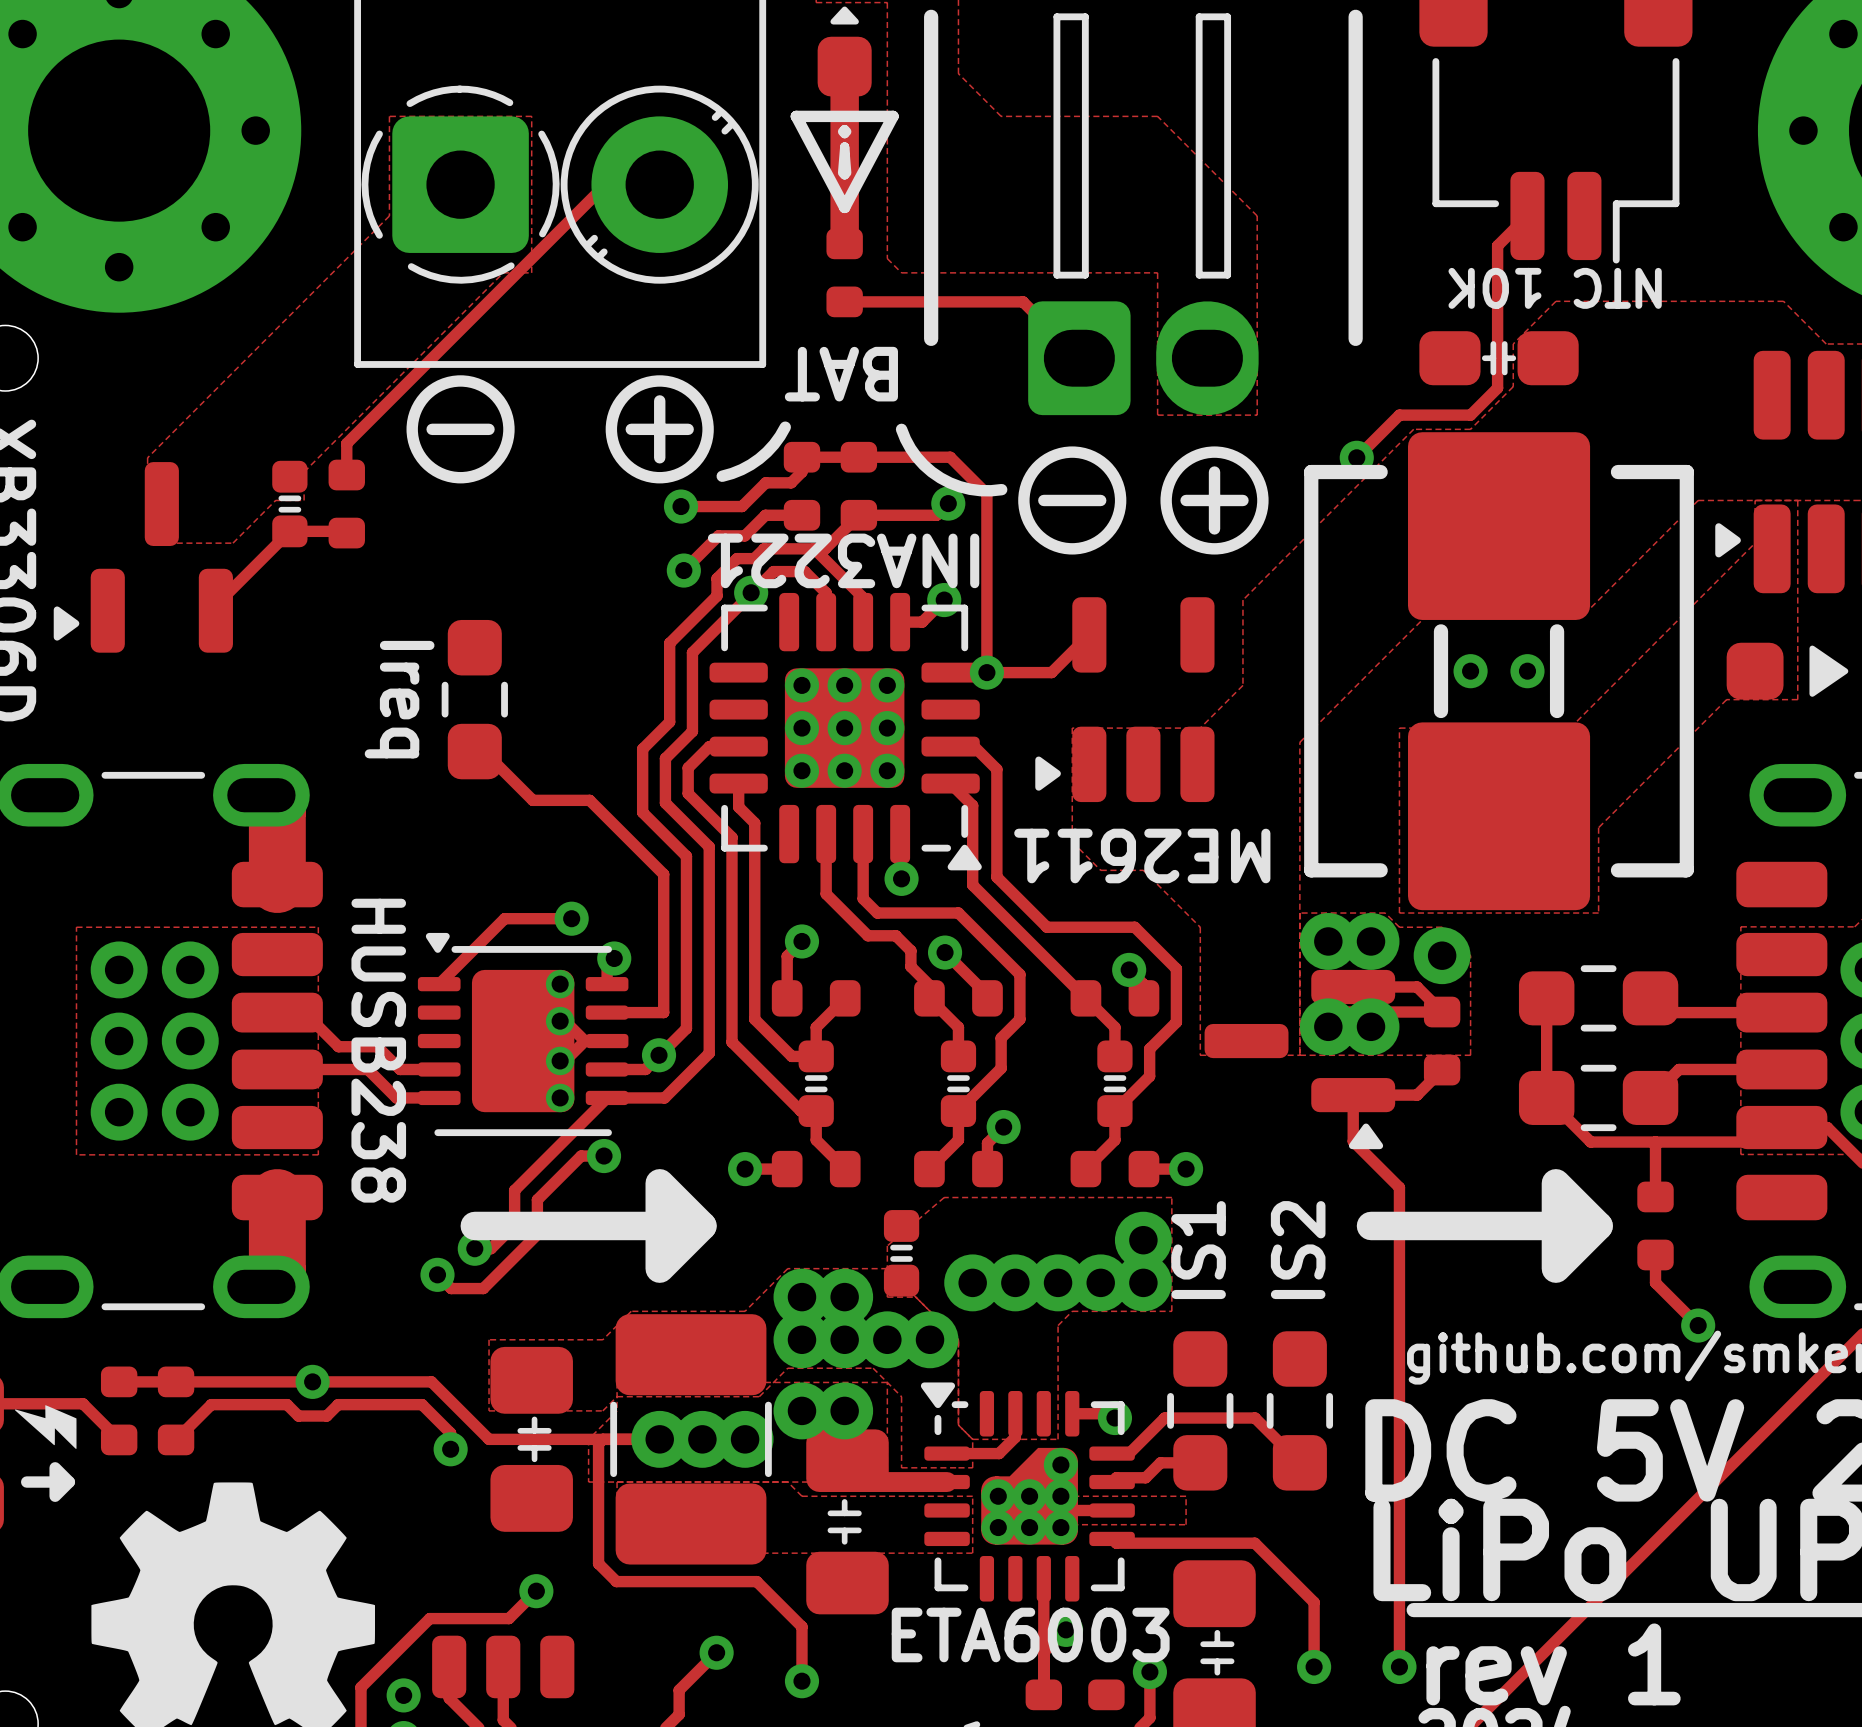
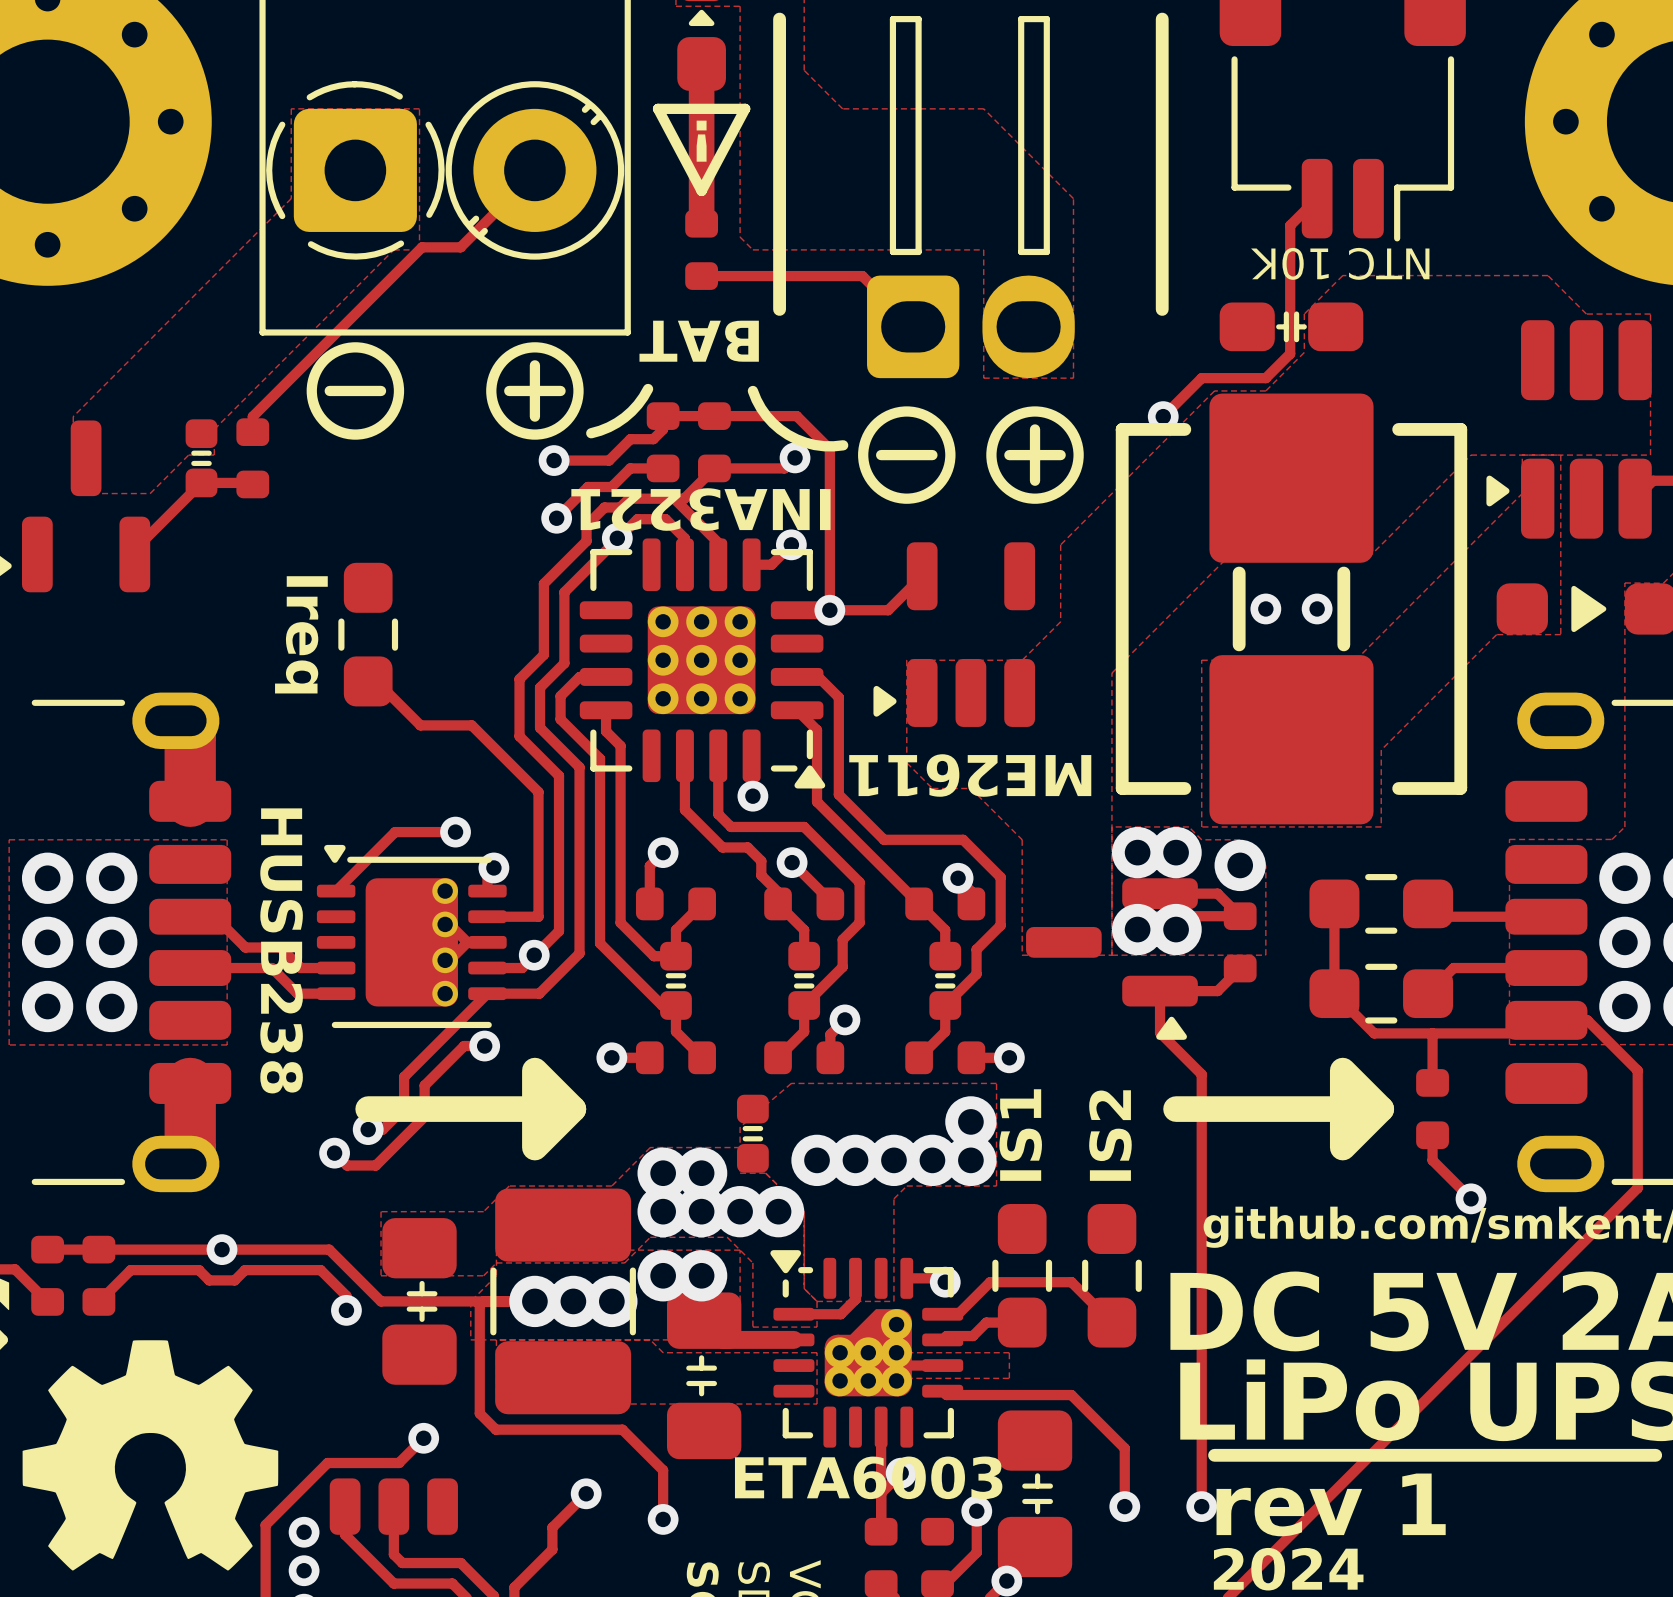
track: (659, 184) (605, 184) (346, 443) (346, 457) -> (534, 170) (534, 172) (460, 247) (422, 247) (252, 416)

